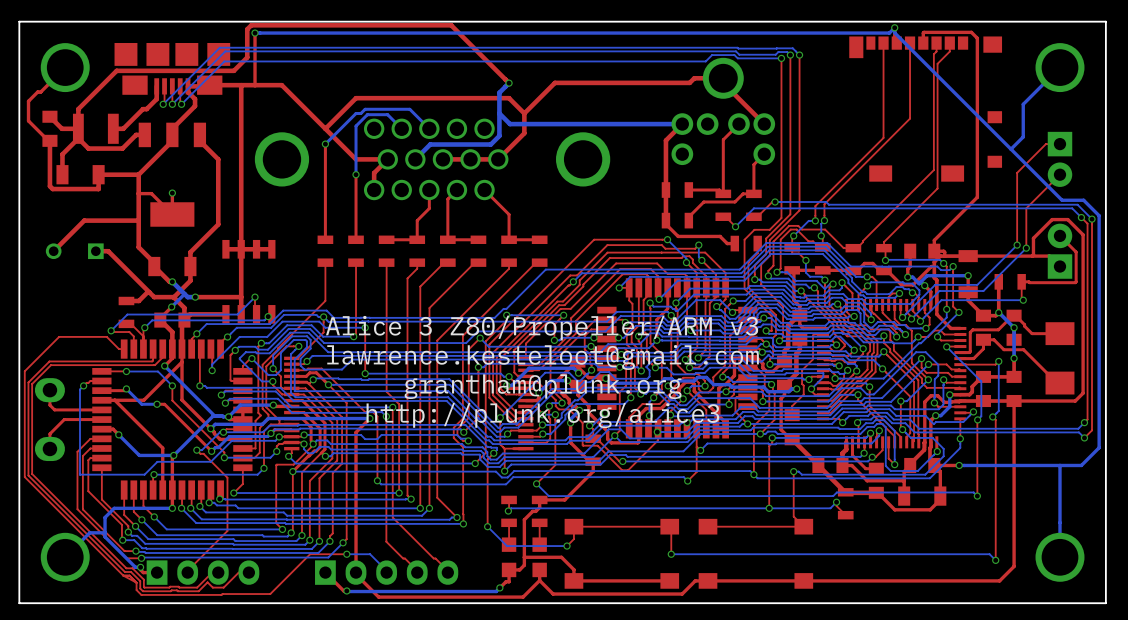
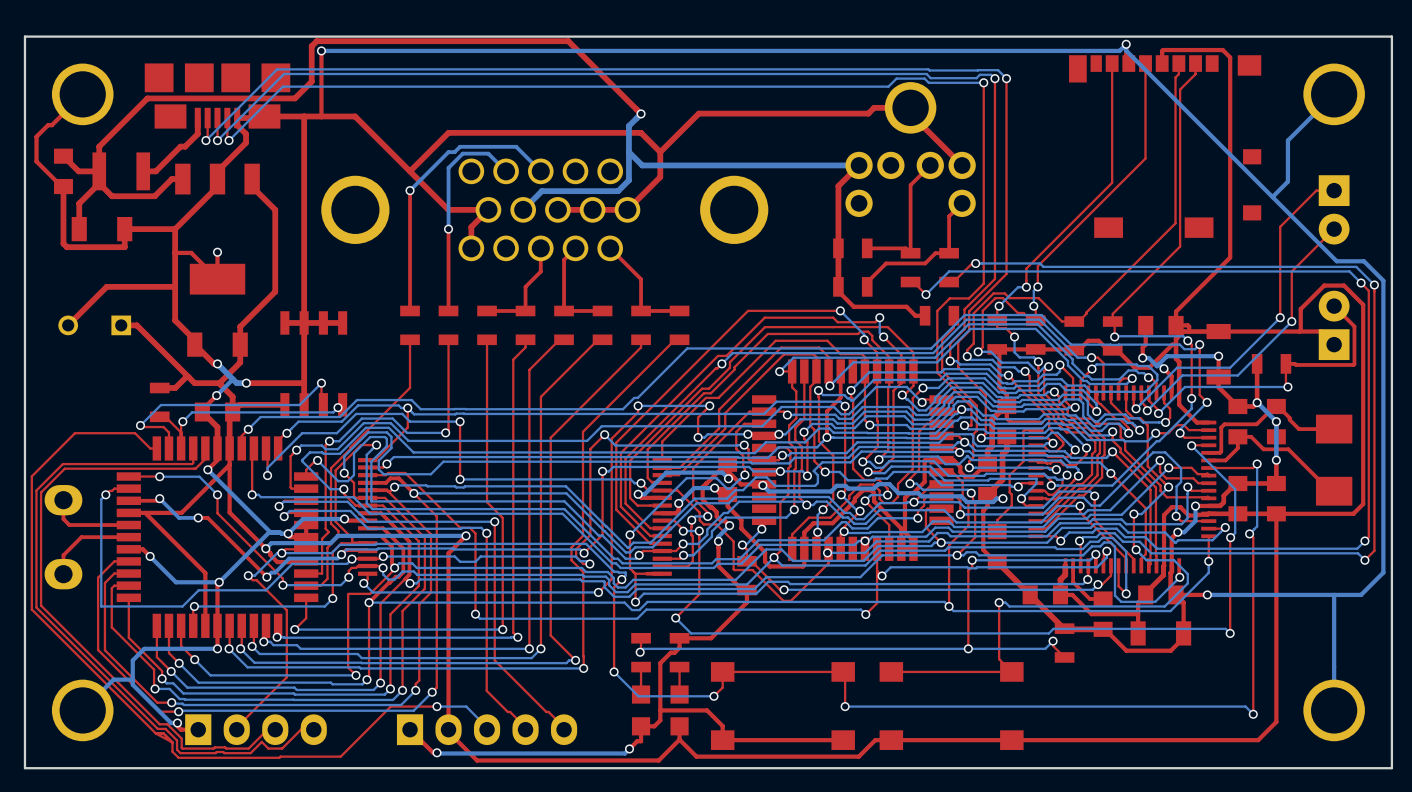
text: Alice 3 Z80/Propeller/ARM v3 (542, 328) -> none
text: lawrence.kesteloot@gmail.com (543, 357) -> none
text: grantham@plunk.org (543, 386) -> none
text: http://plunk.org/alice3 (542, 415) -> none

